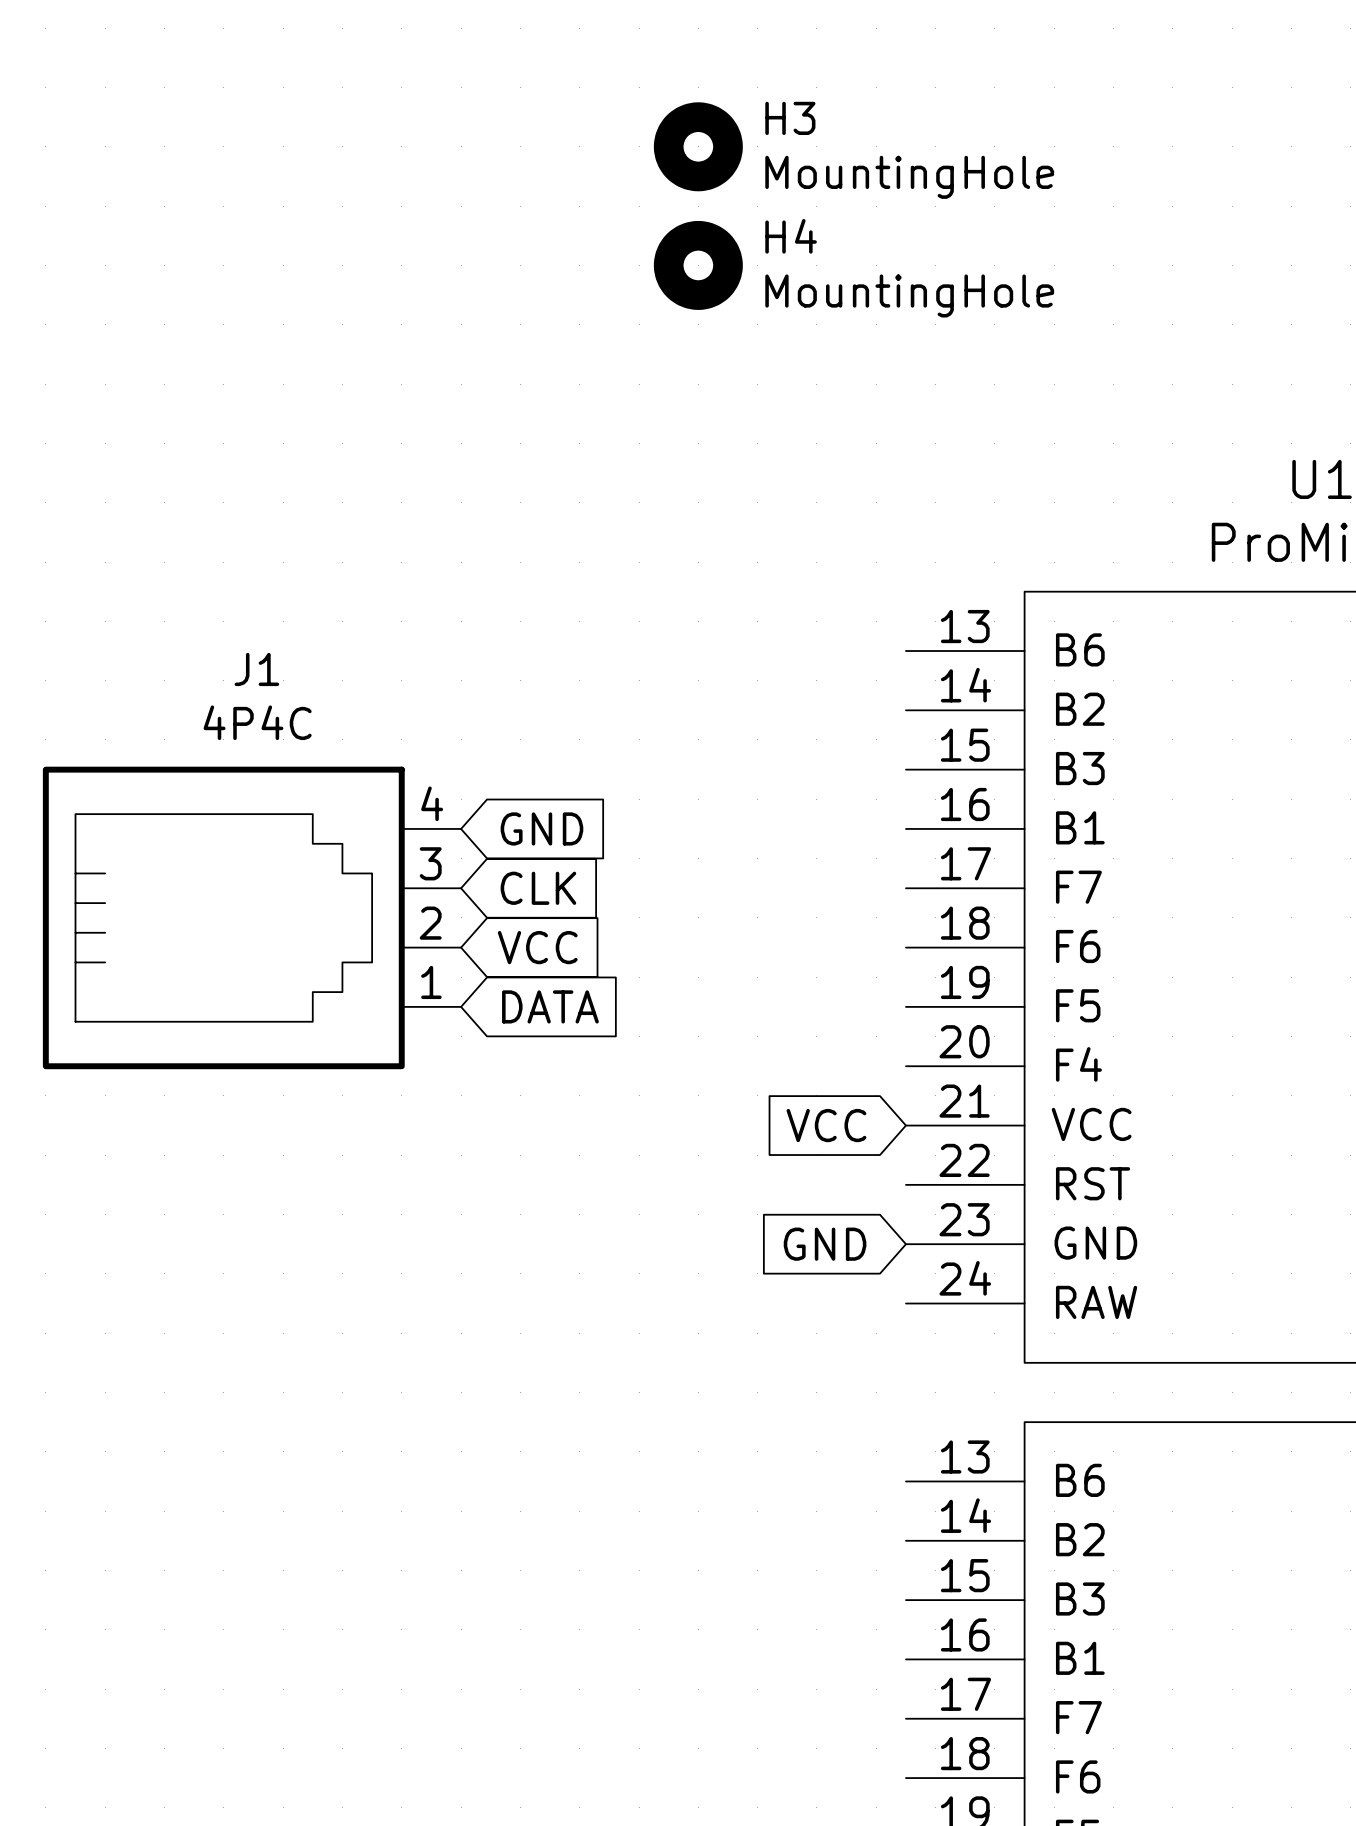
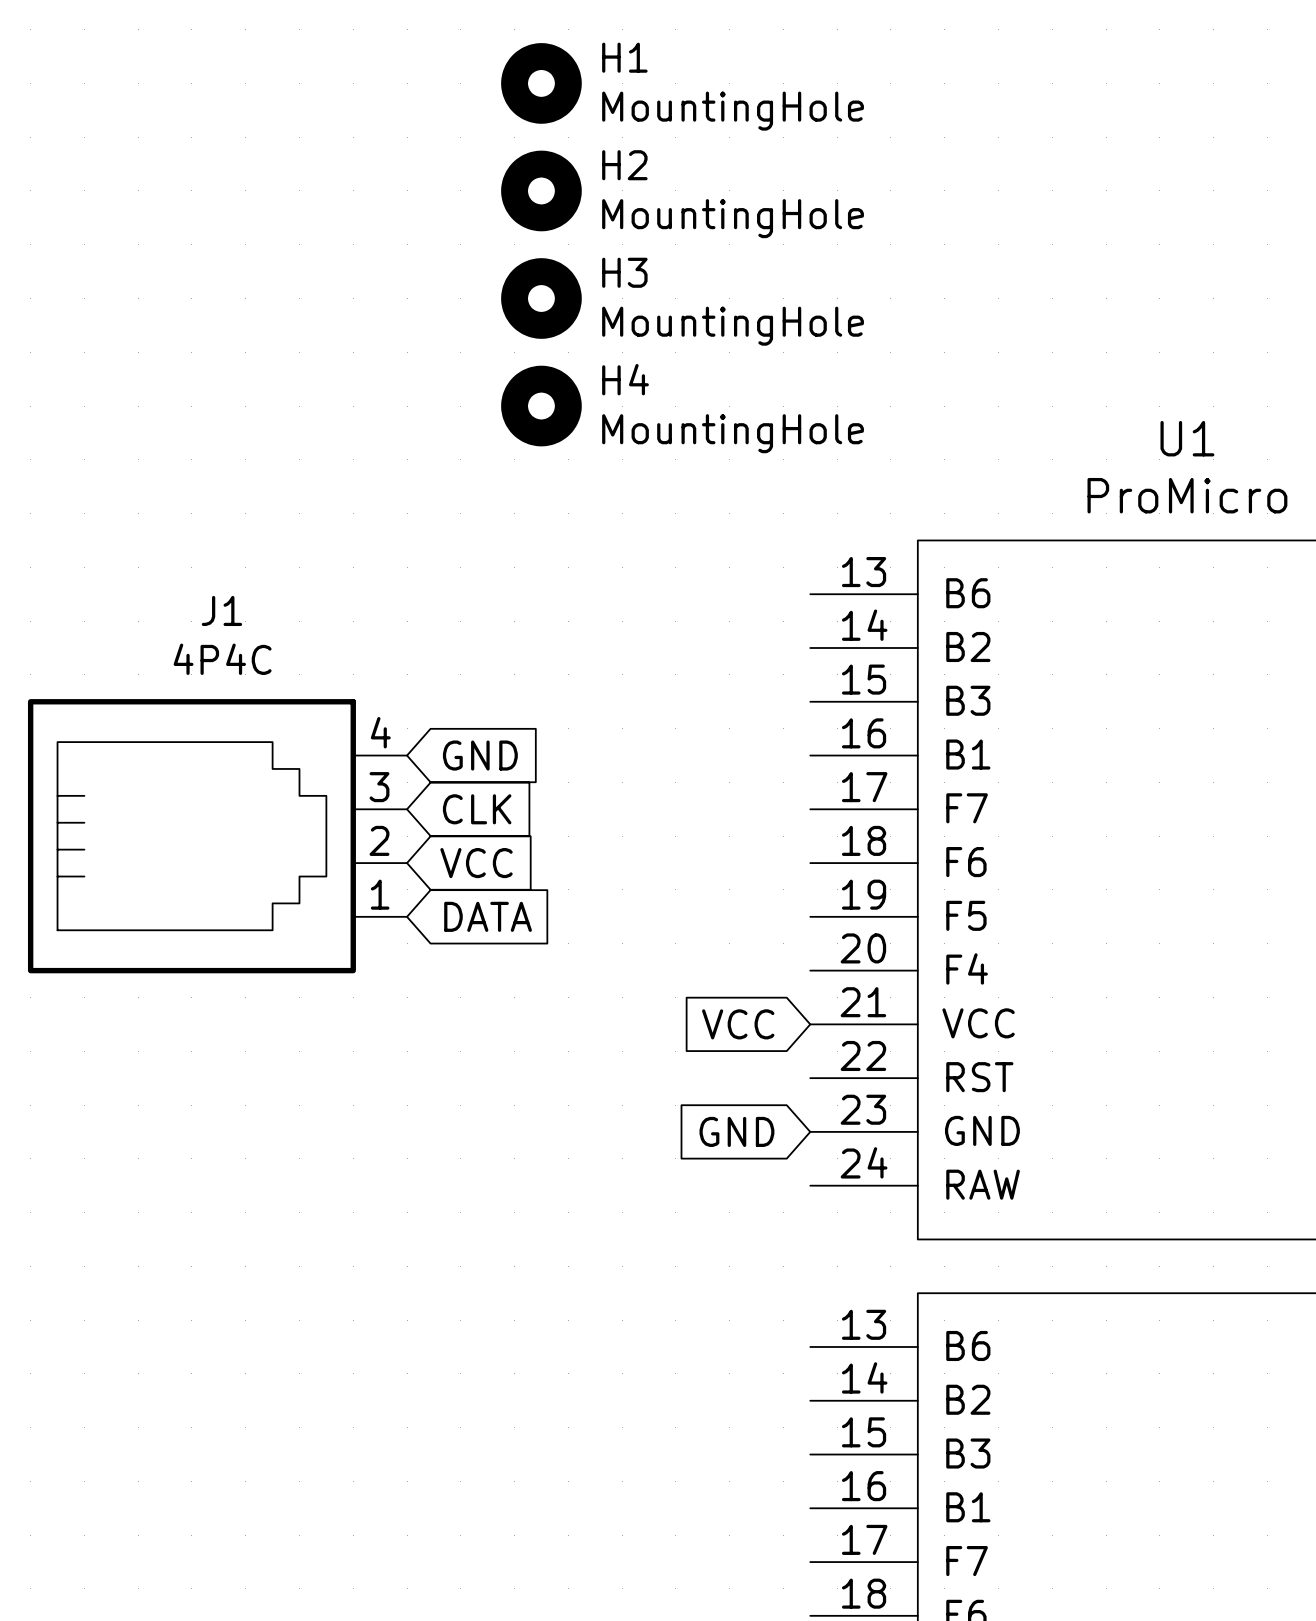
H1: none -> MountingHole (541, 83)
H3 position: (698, 146) -> (541, 298)
H2: none -> MountingHole (541, 190)
H4 position: (698, 265) -> (541, 406)

